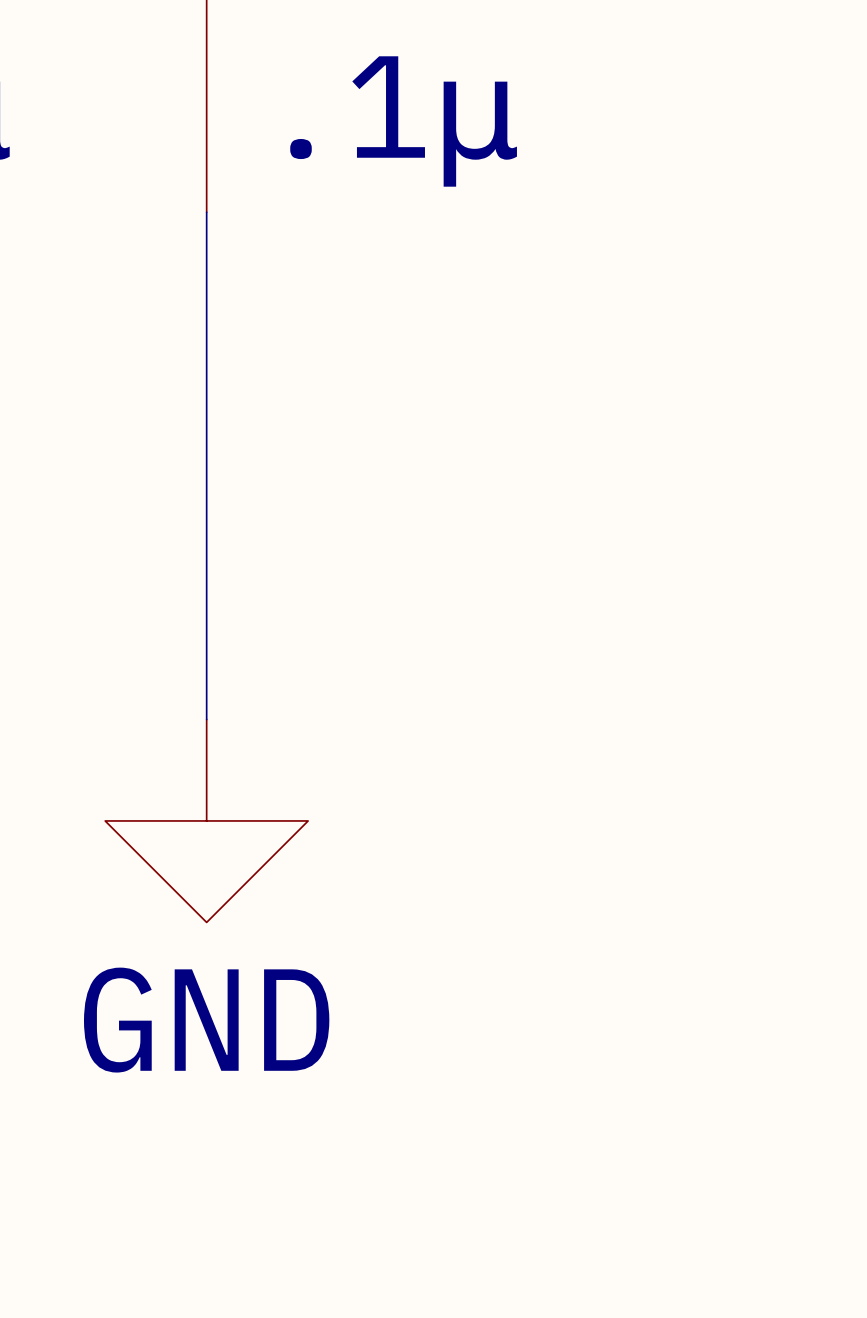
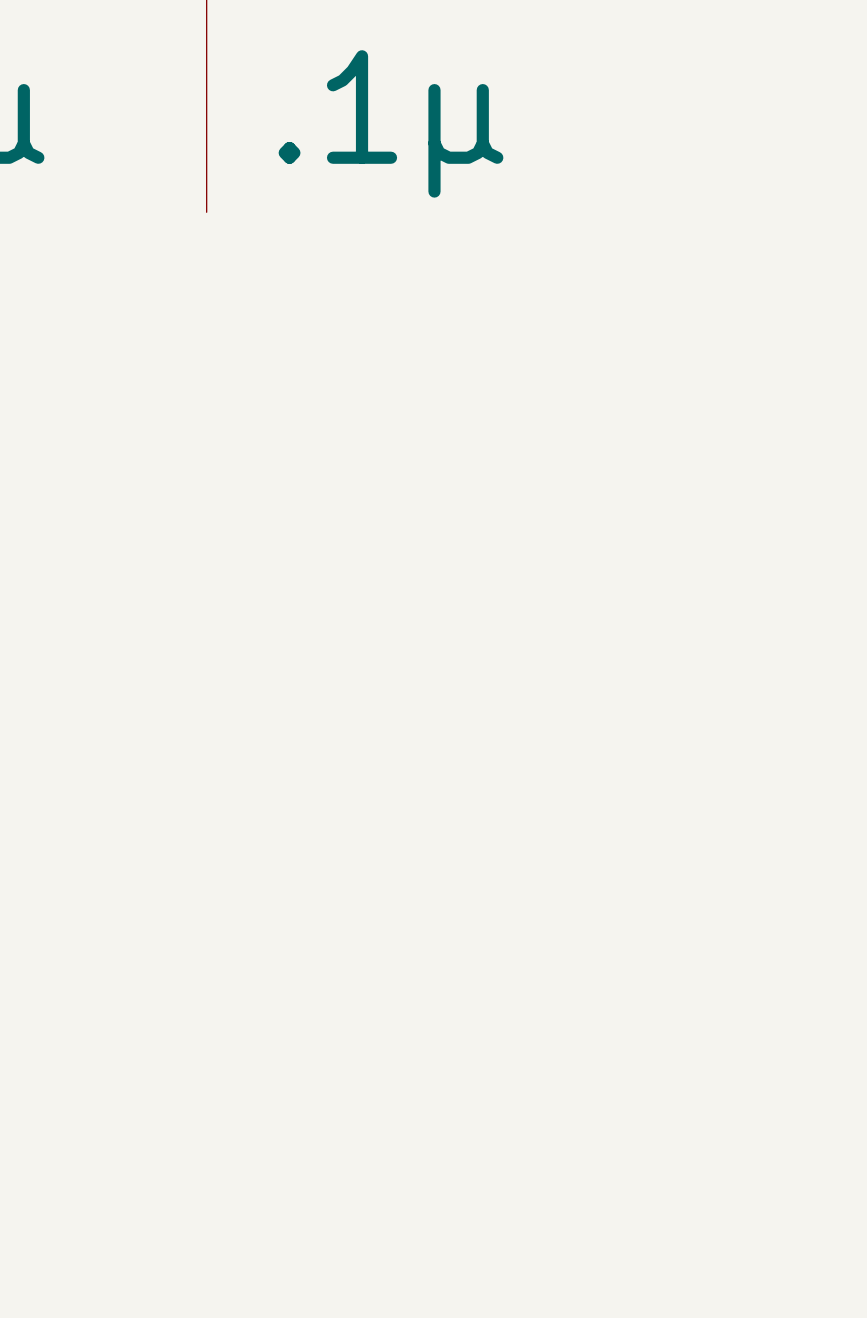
wire: (206, 212) (206, 719) -> none
power symbol: GND (206, 820) -> none

